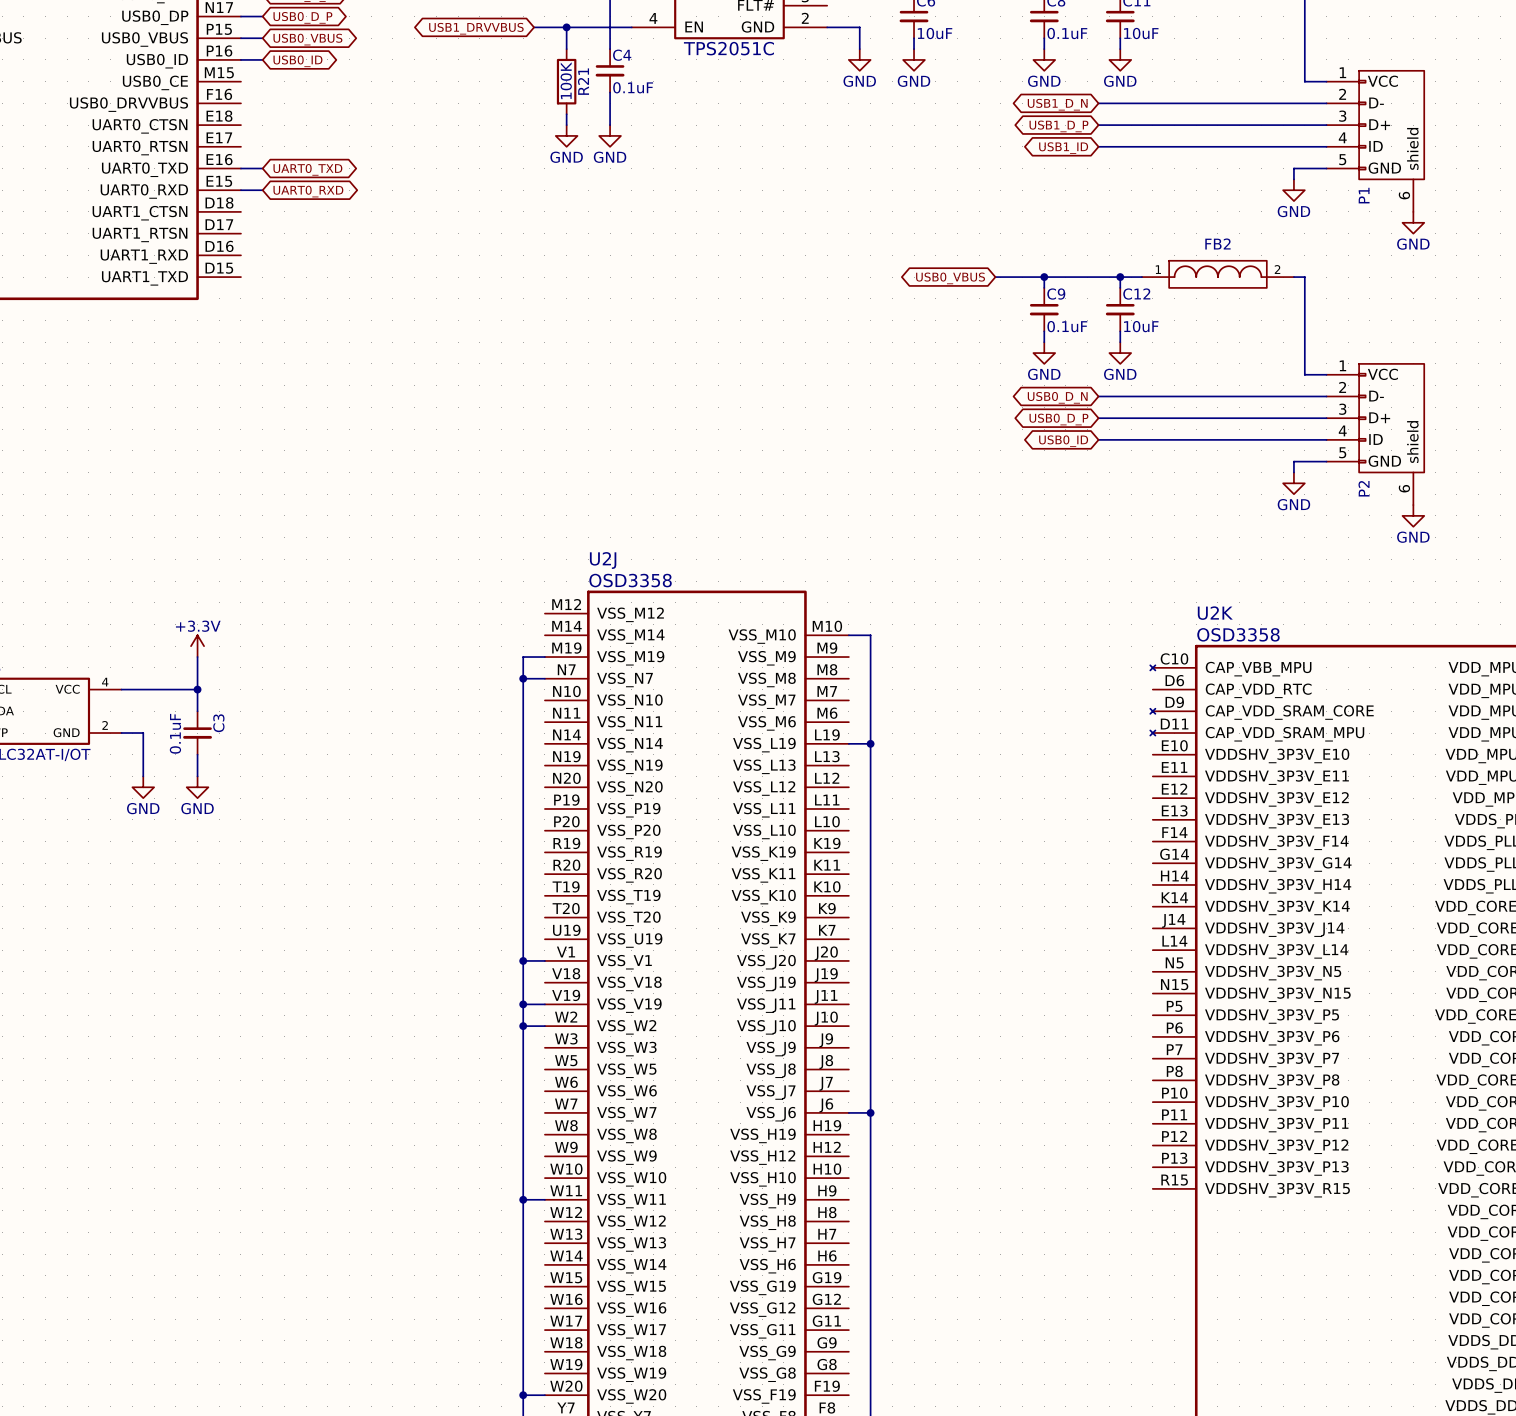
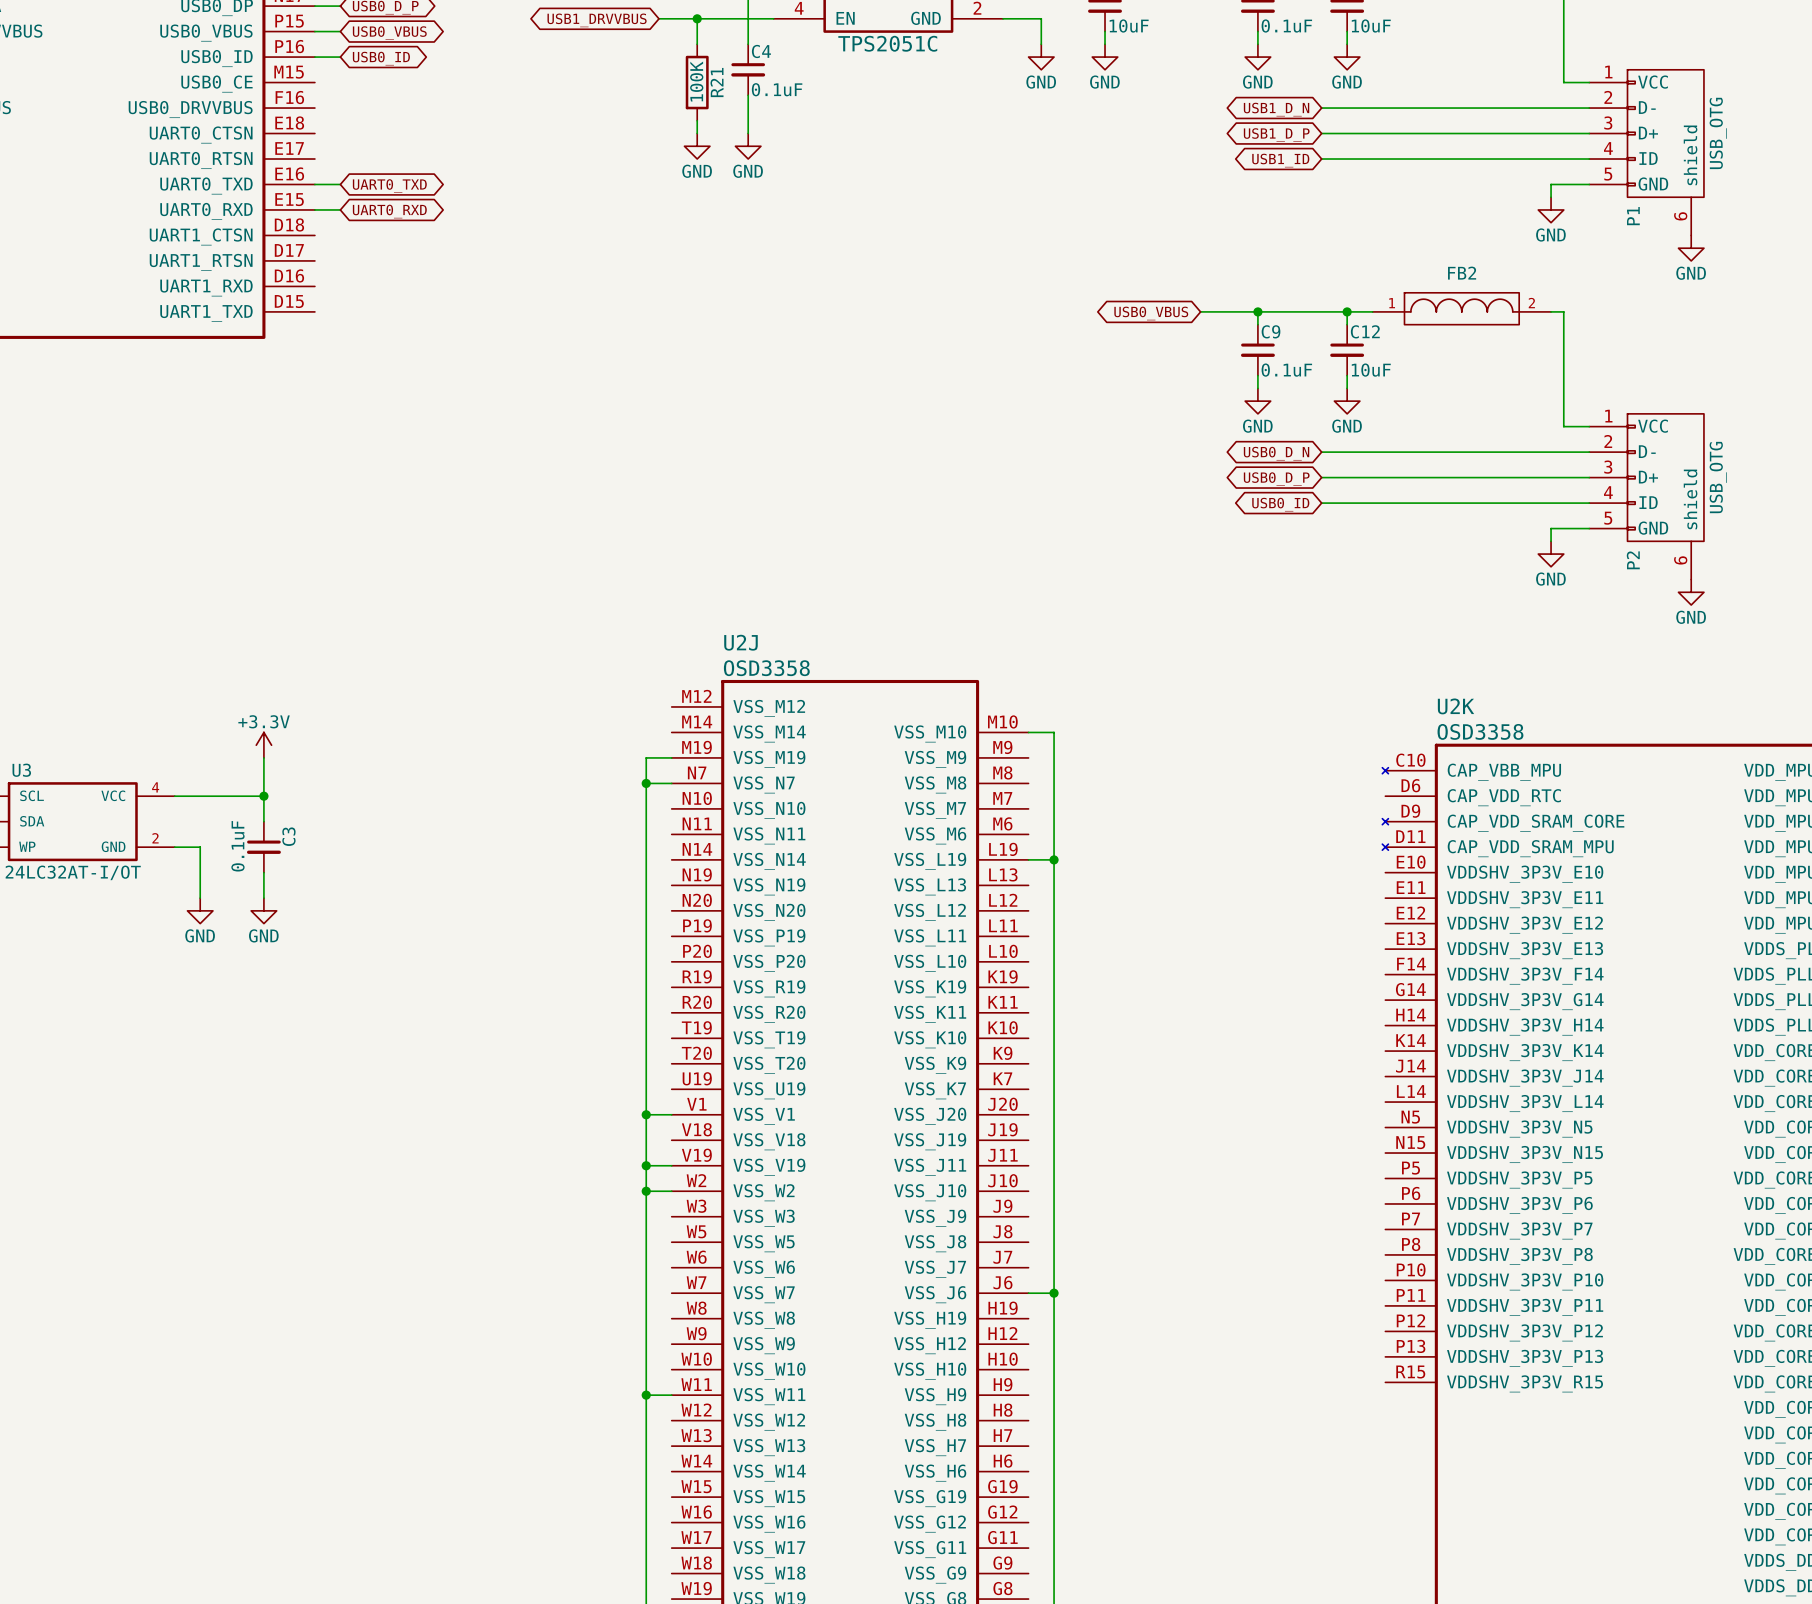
P1 value: none -> USB_OTG (1718, 133)
P2 value: none -> USB_OTG (1718, 477)

